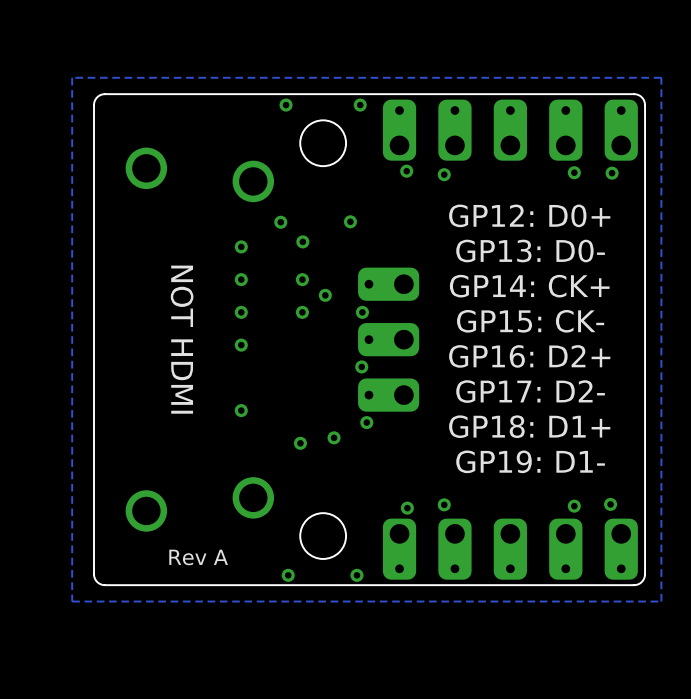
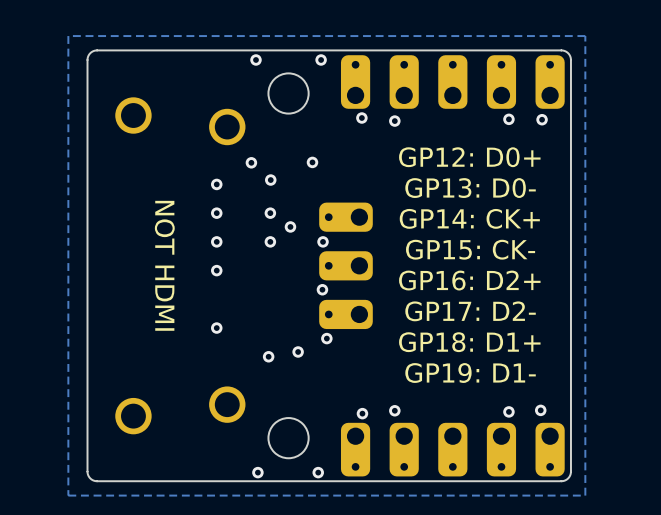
text: Rev A (198, 557) -> none

